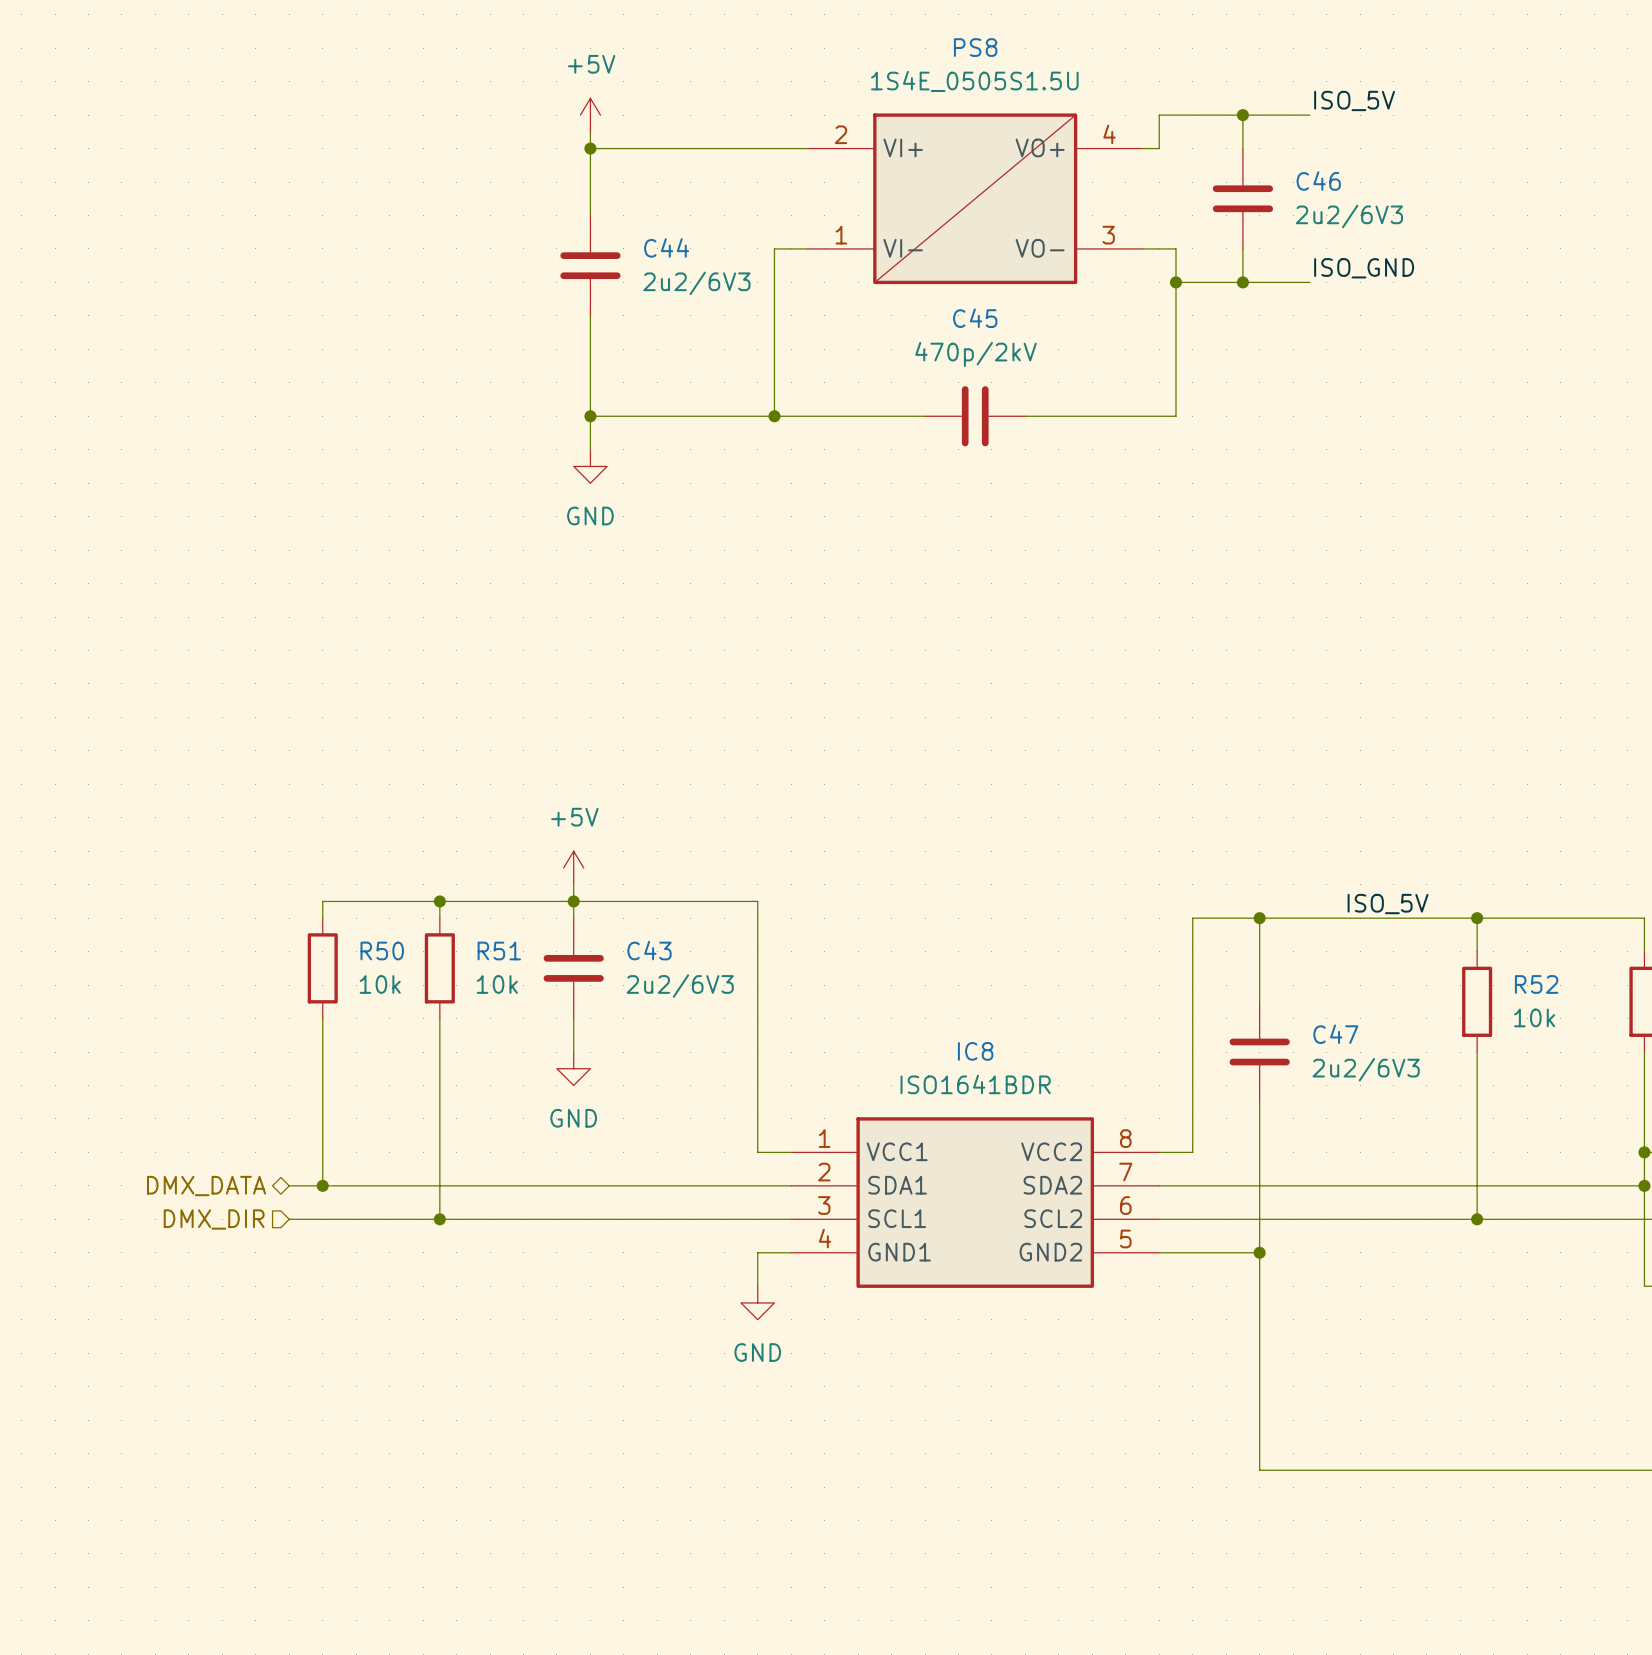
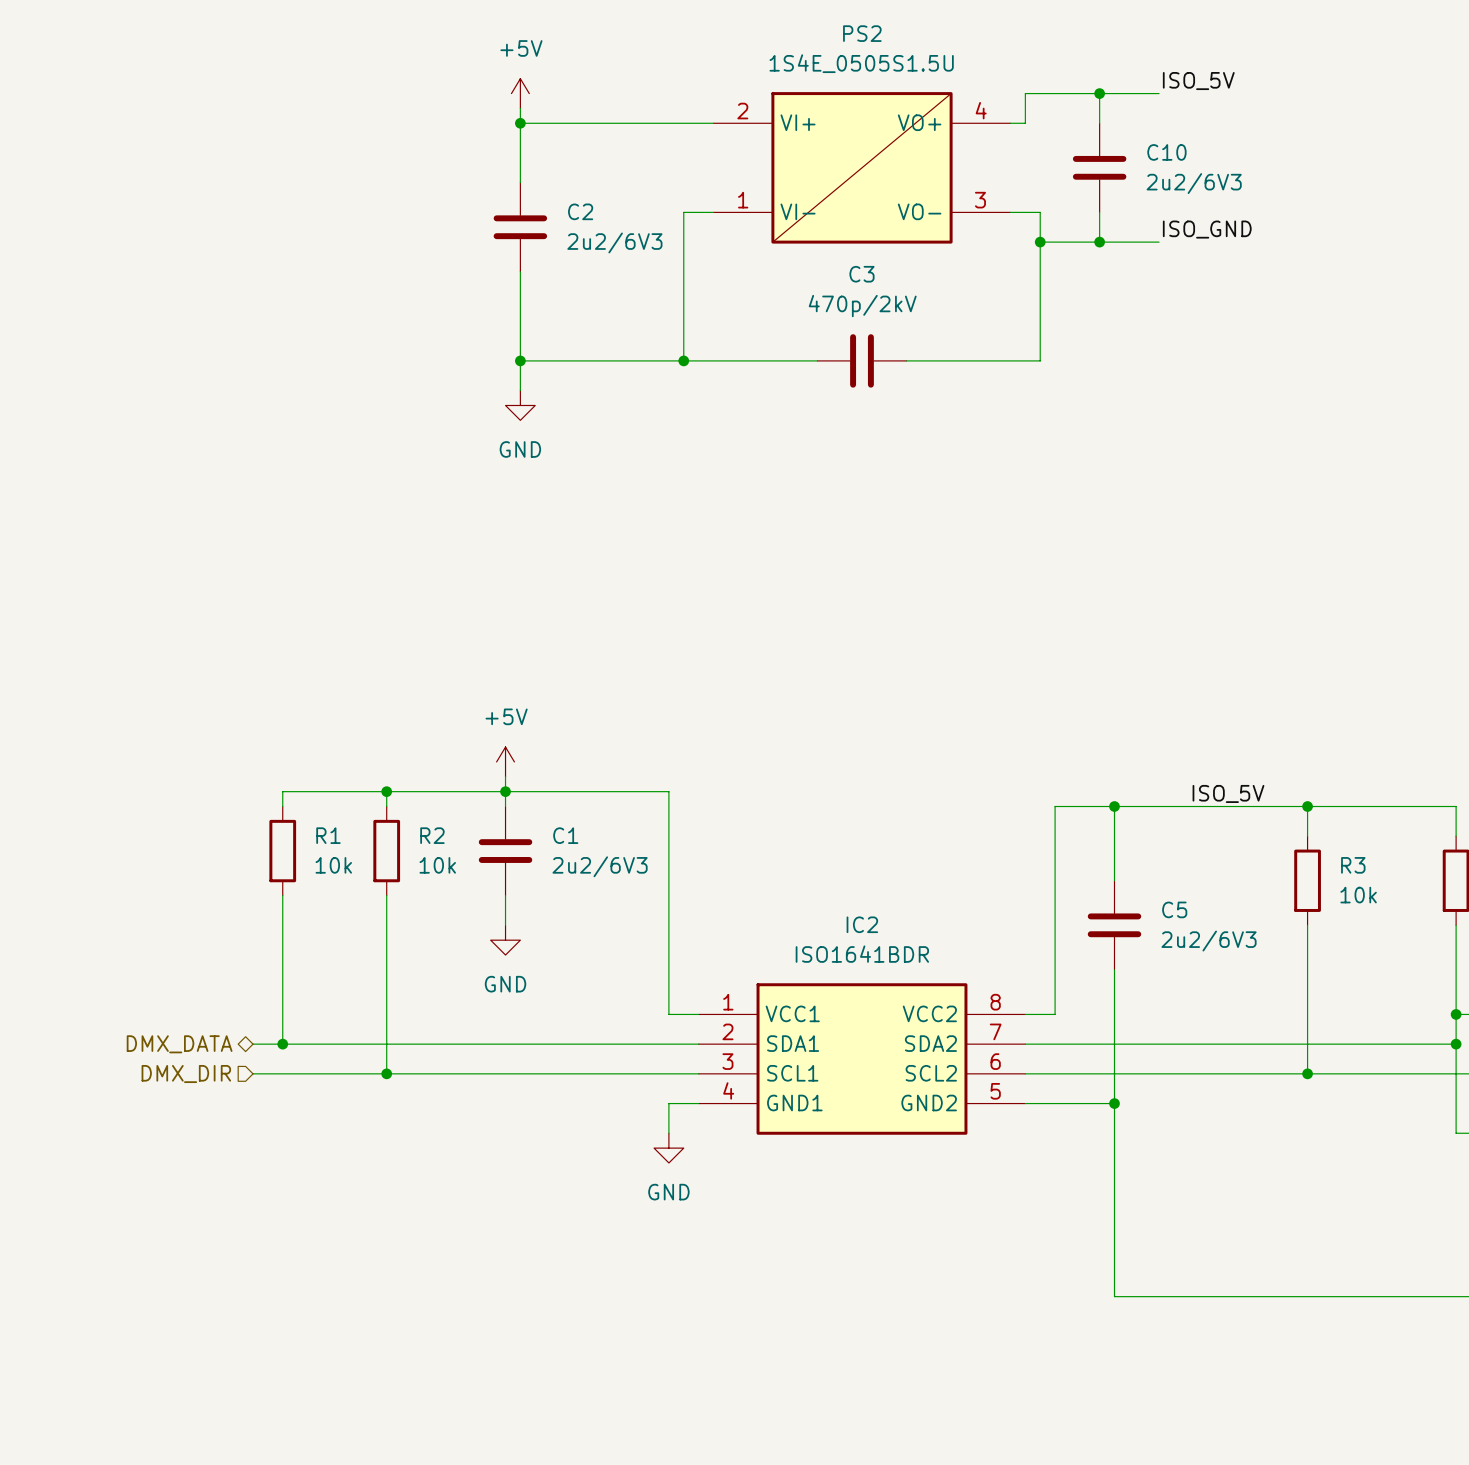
PS8 name: PS8 (975, 47) -> PS2 (862, 33)
C46 name: C46 (1318, 181) -> C10 (1166, 152)
C44 name: C44 (666, 247) -> C2 (580, 211)
C45 name: C45 (975, 318) -> C3 (861, 274)
C43 name: C43 (649, 950) -> C1 (565, 835)
R50 name: R50 (382, 951) -> R1 (328, 835)
R51 name: R51 (499, 951) -> R2 (432, 835)
R52 name: R52 (1536, 984) -> R3 (1353, 865)
C47 name: C47 (1335, 1034) -> C5 (1174, 909)
IC8 name: IC8 (975, 1051) -> IC2 (862, 924)

